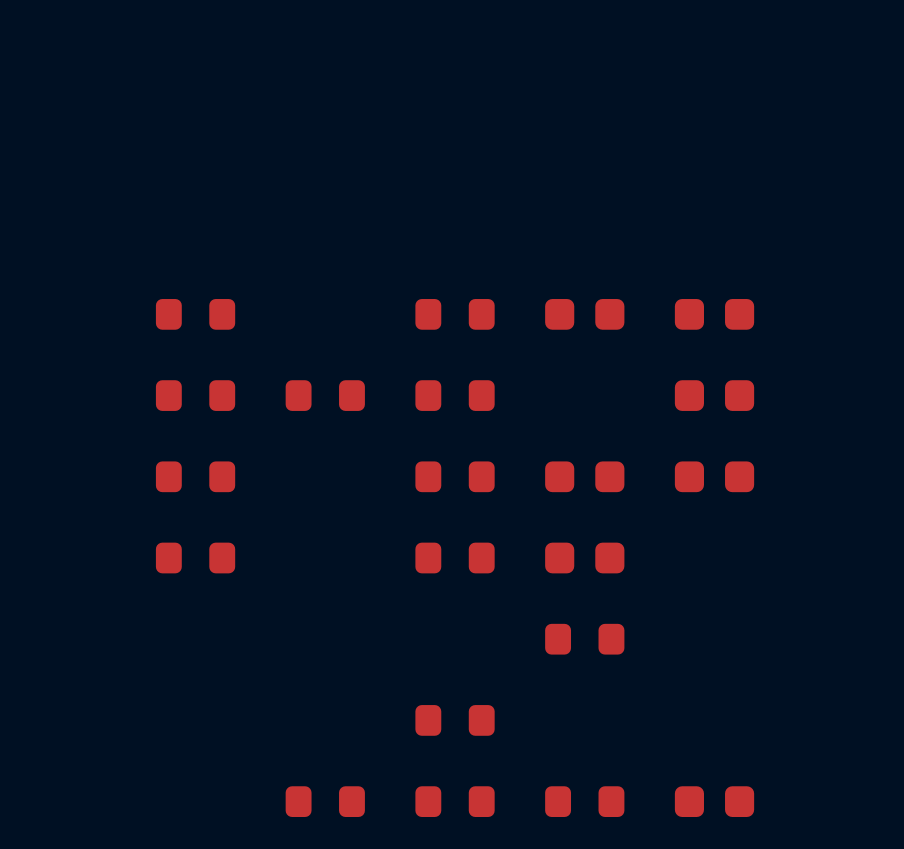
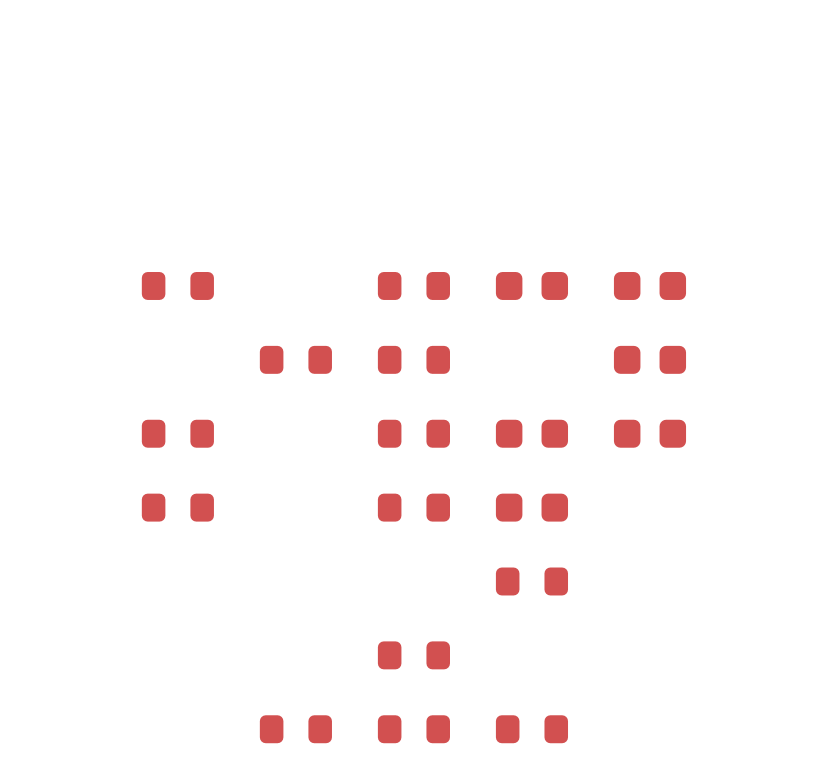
part: (195, 395) -> none
part: (714, 801) -> none

